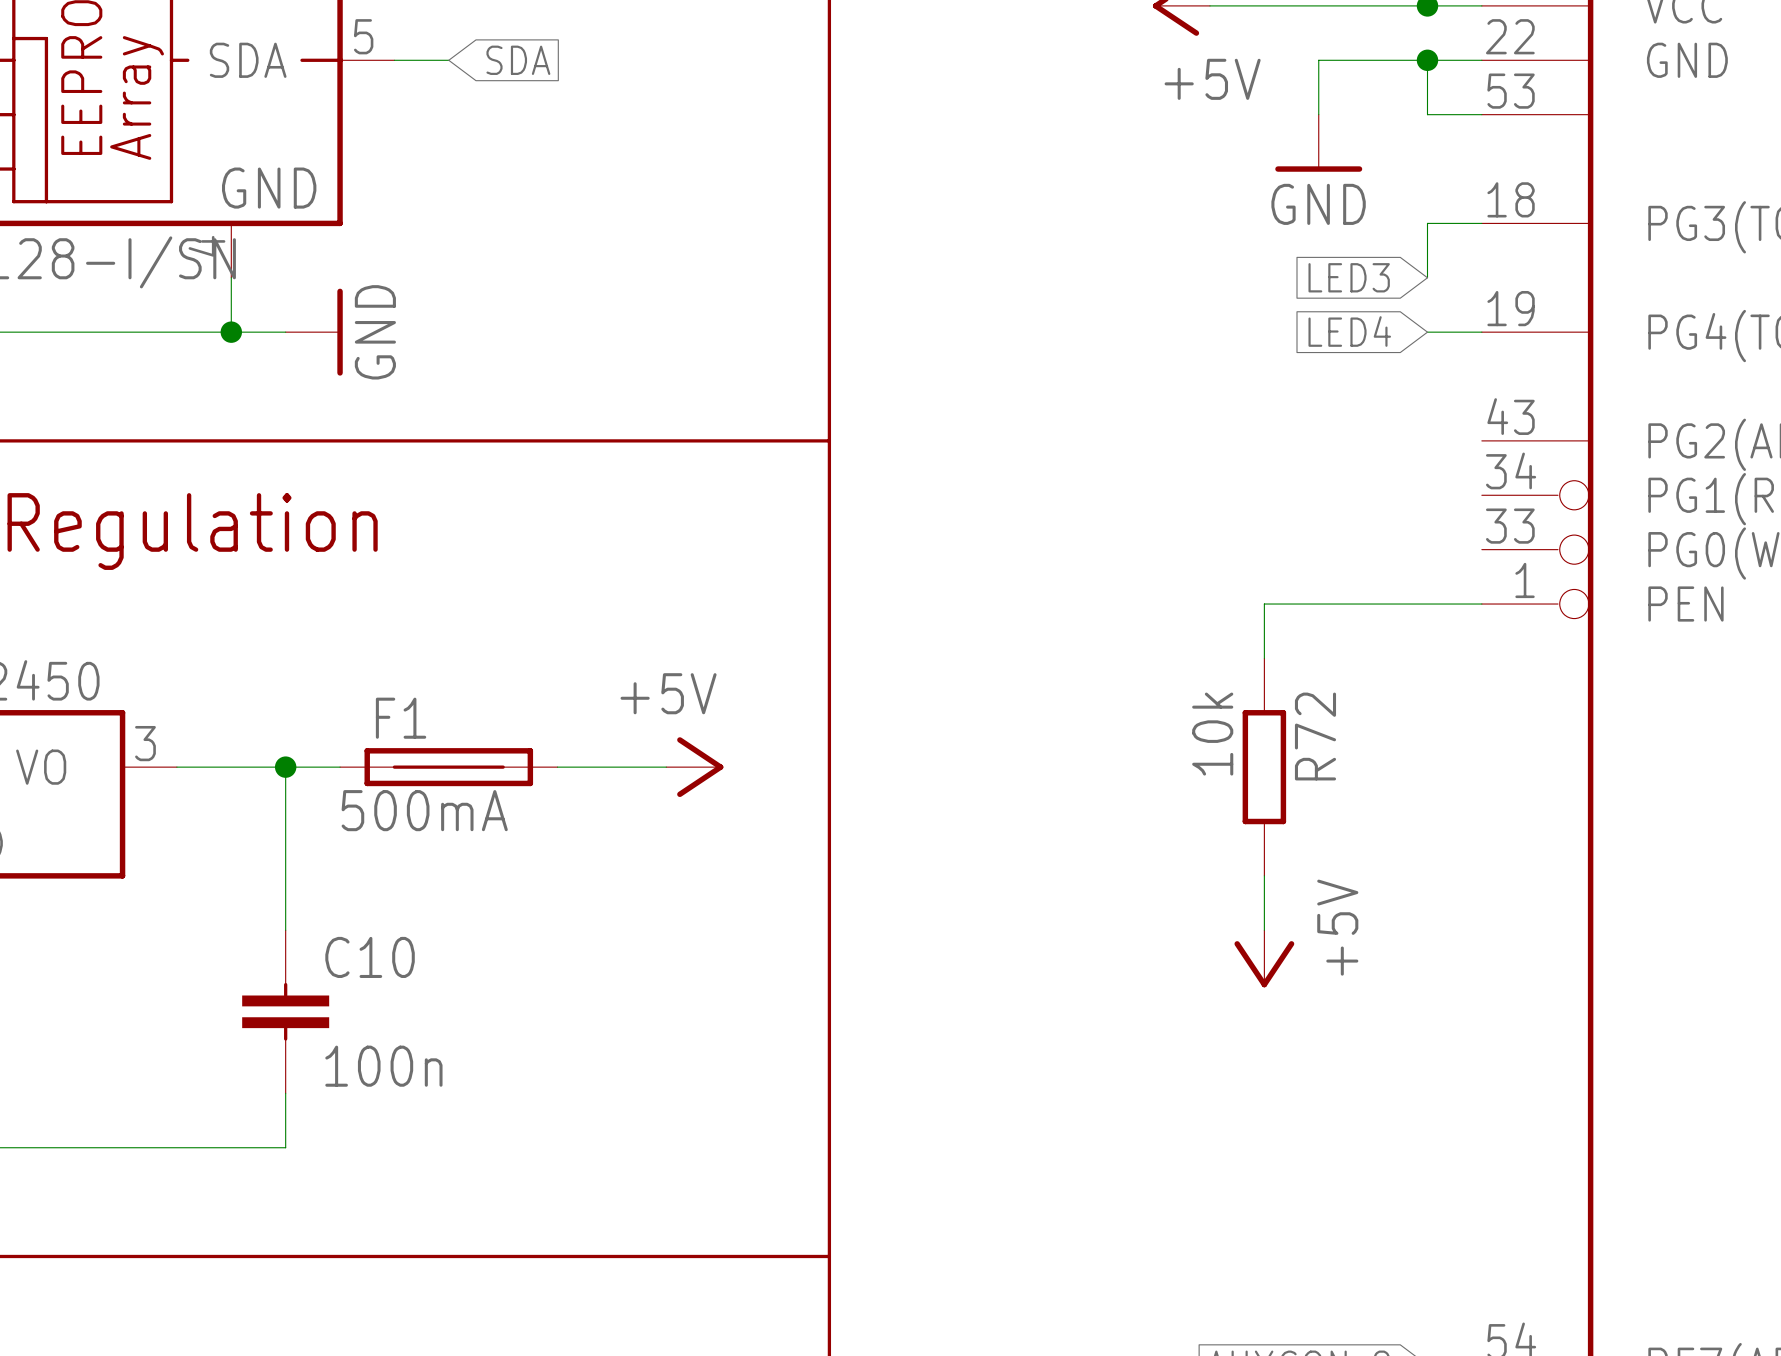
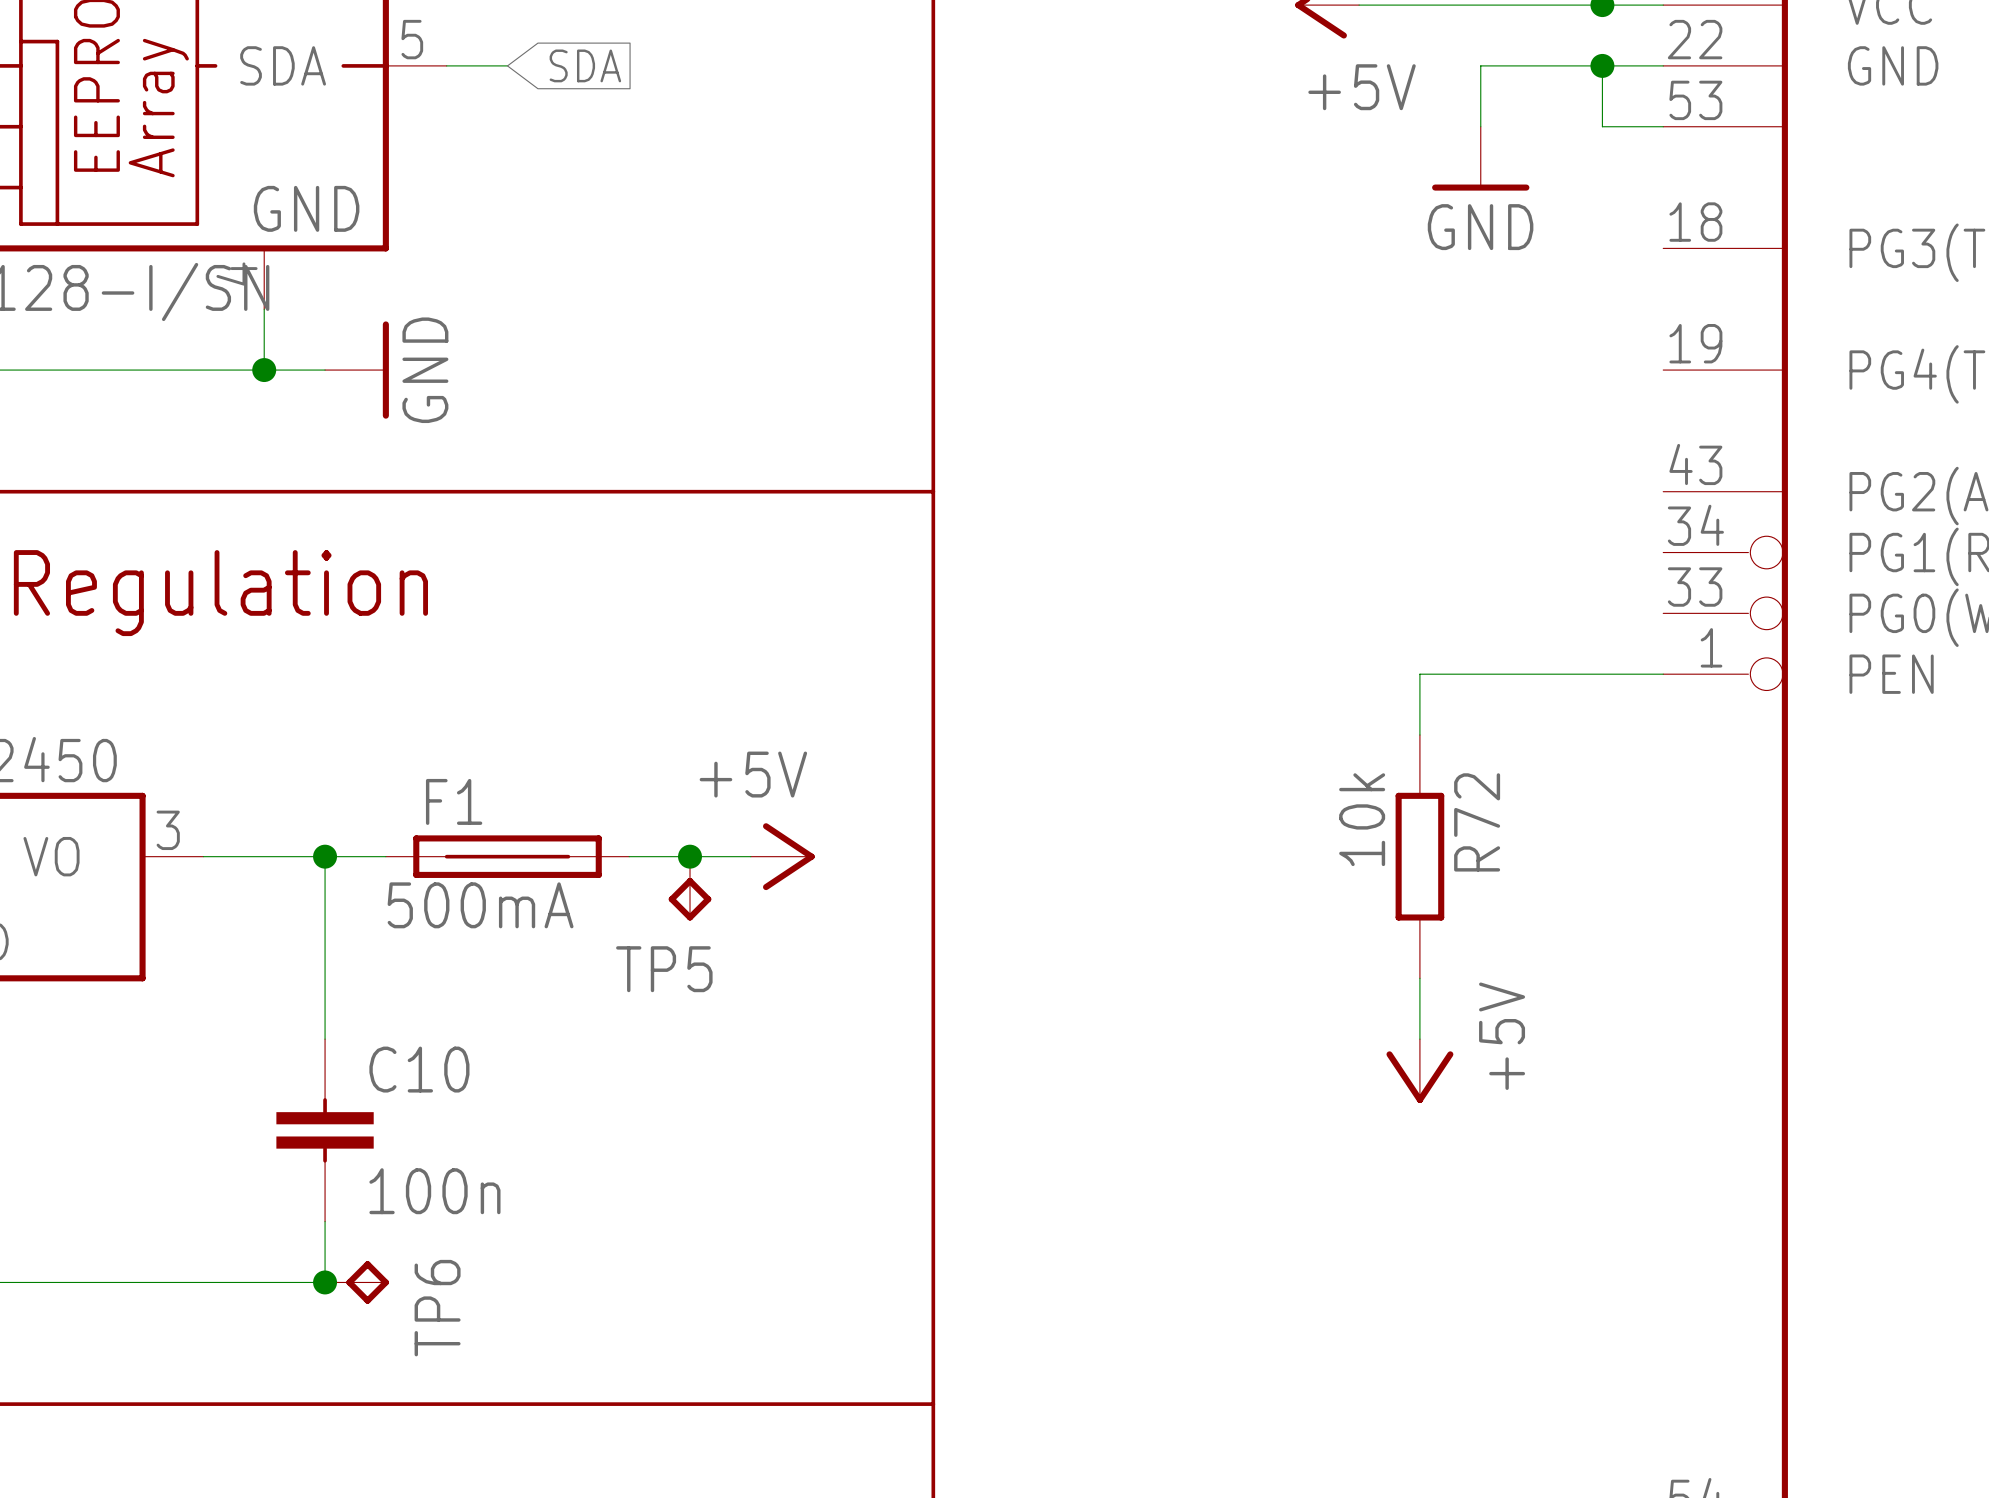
wire: (1481, 223) (1427, 223) (1427, 277) -> none
global label: LED3 (1349, 277) -> none
global label: LED4 (1349, 331) -> none
wire: (1427, 332) (1481, 332) -> none
junction: none -> (690, 856)
TP5: none -> (690, 888)
junction: none -> (325, 1282)
TP6: none -> (356, 1282)

